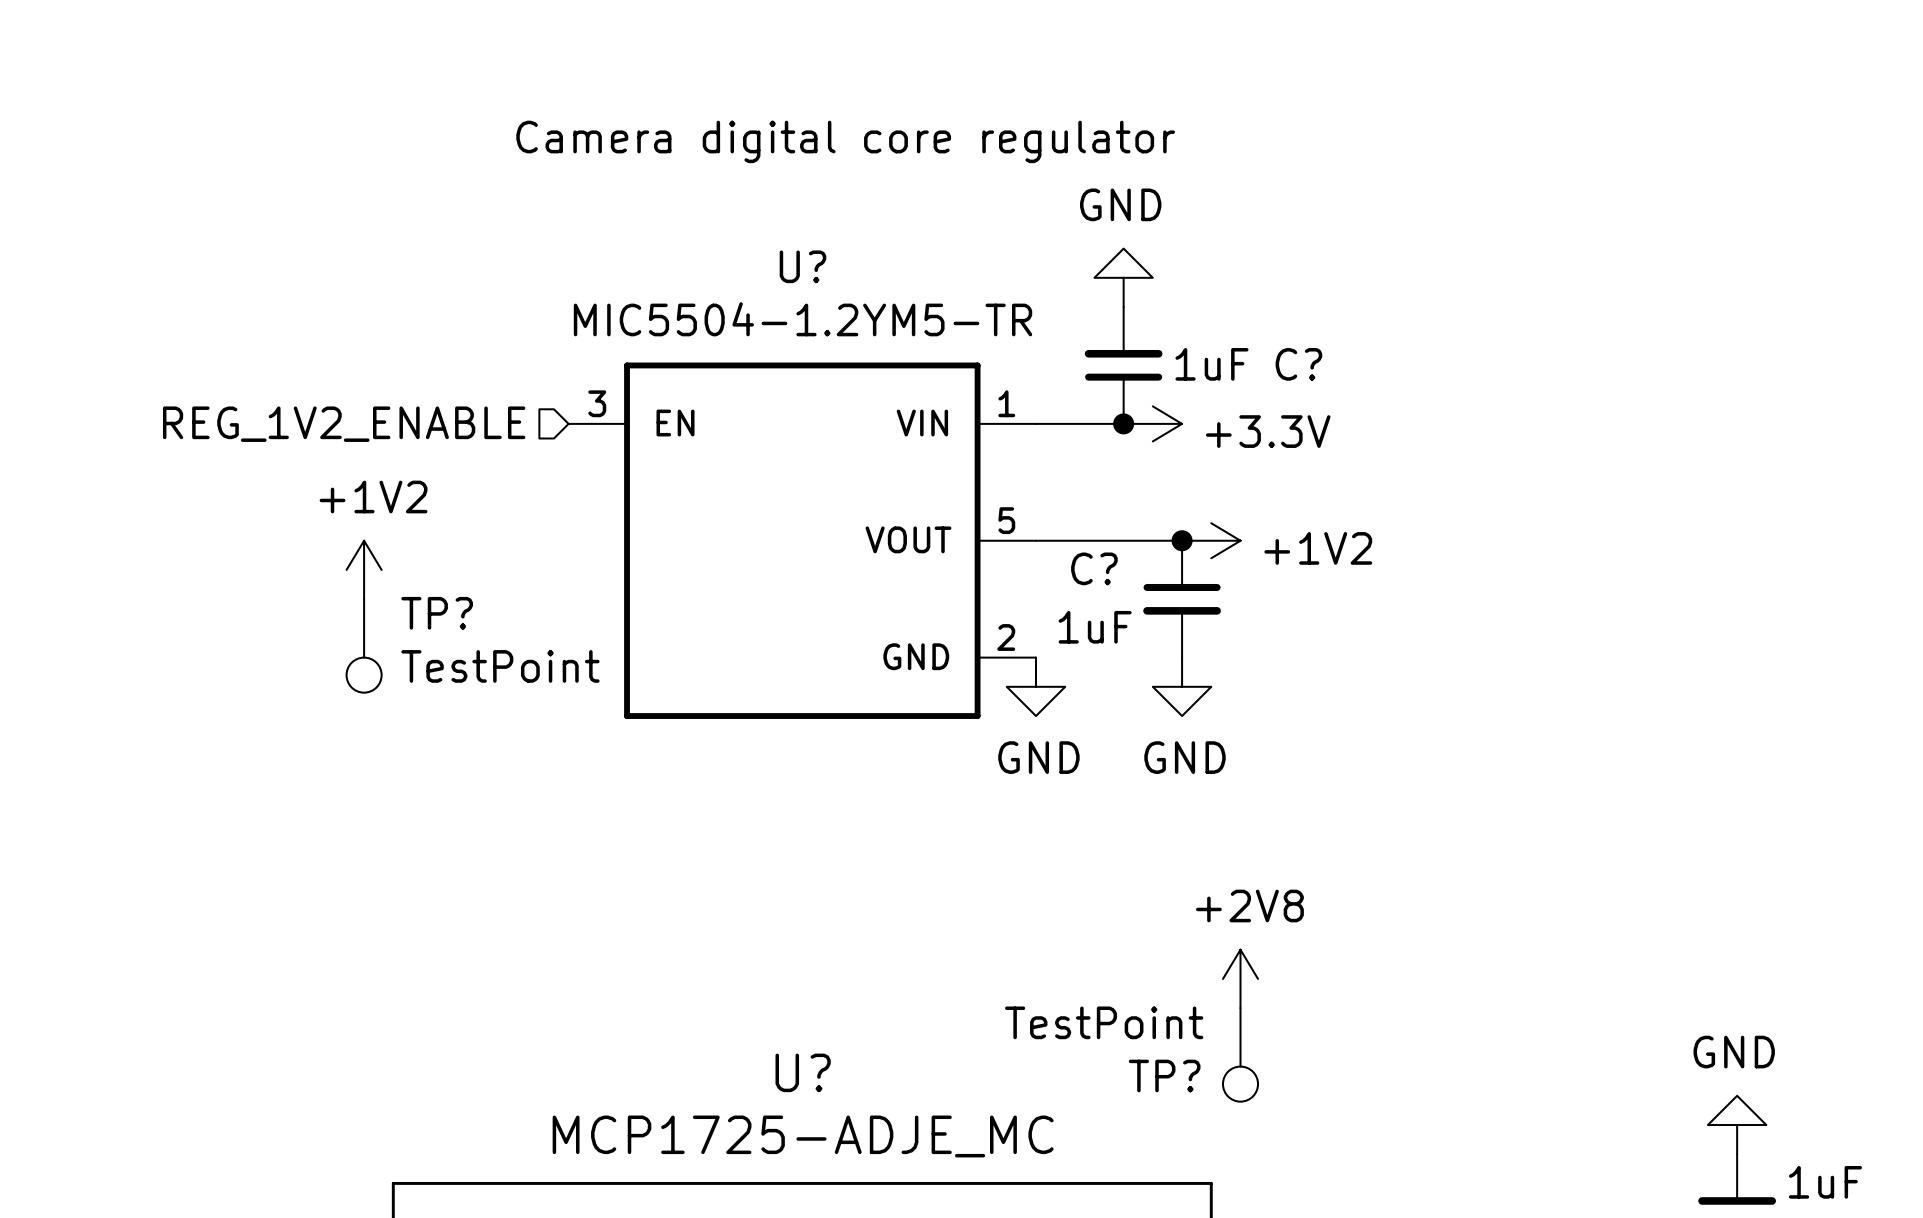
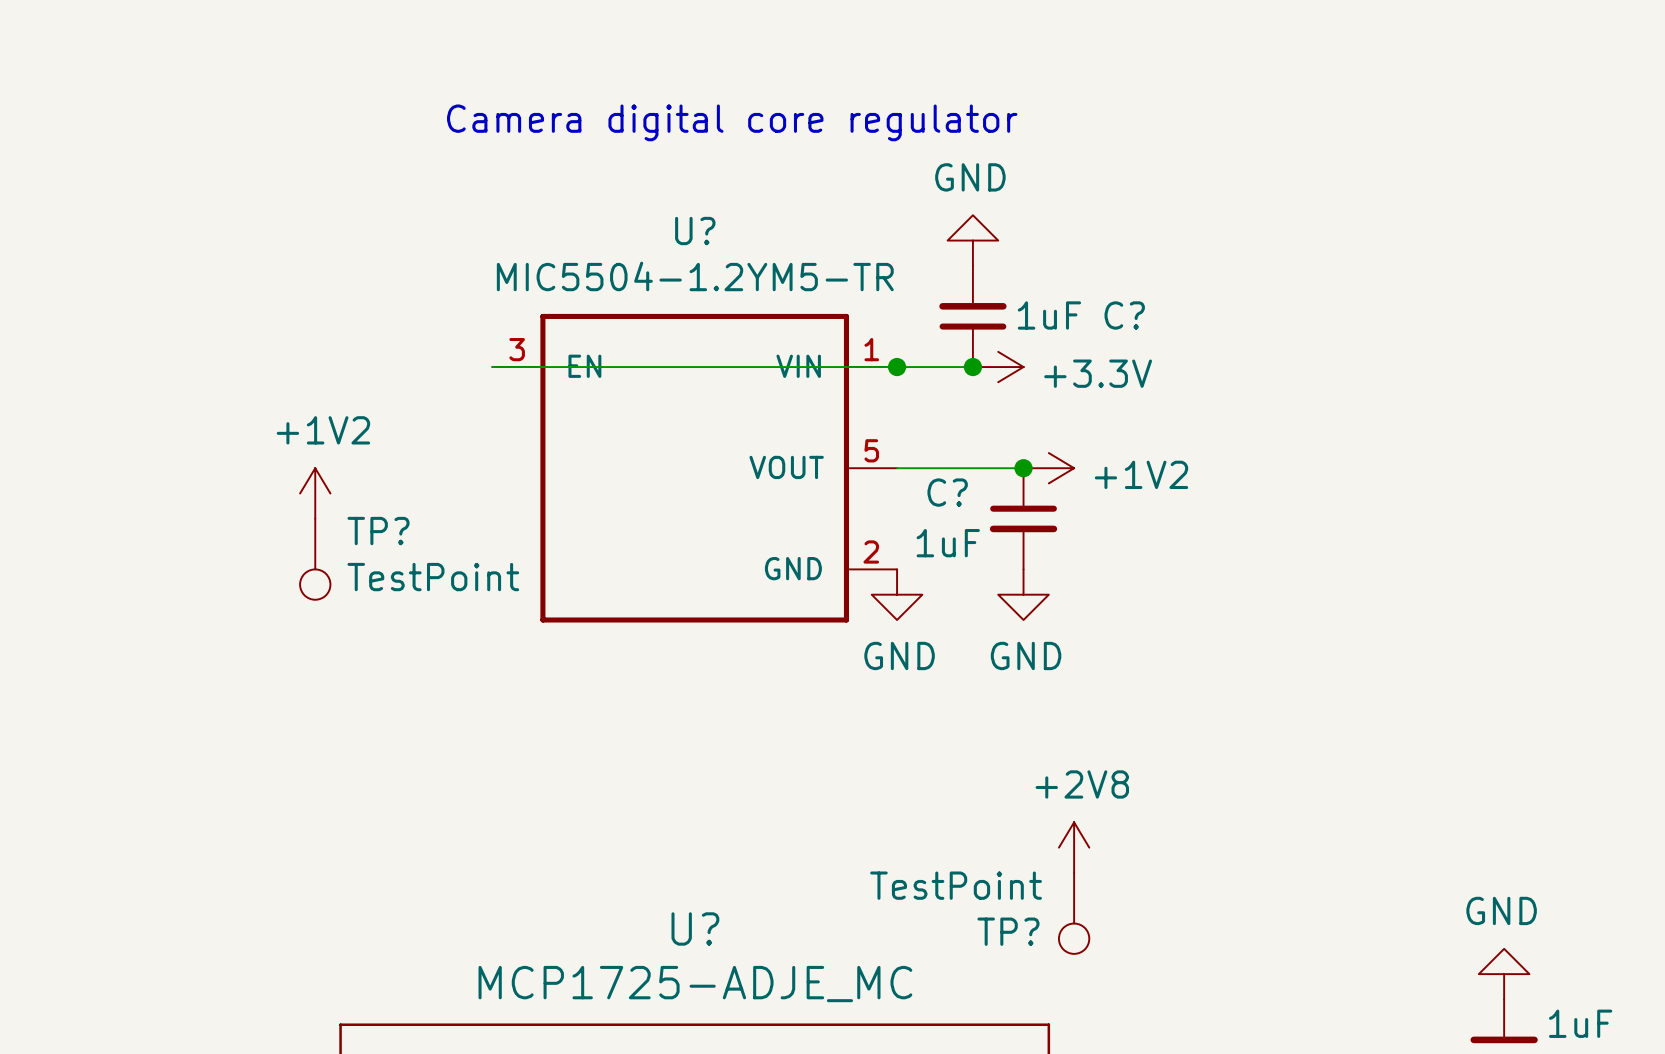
wire: none -> (492, 367) (897, 367)
junction: none -> (897, 367)
hierarchical label: REG_1V2_ENABLE (344, 424) -> none

